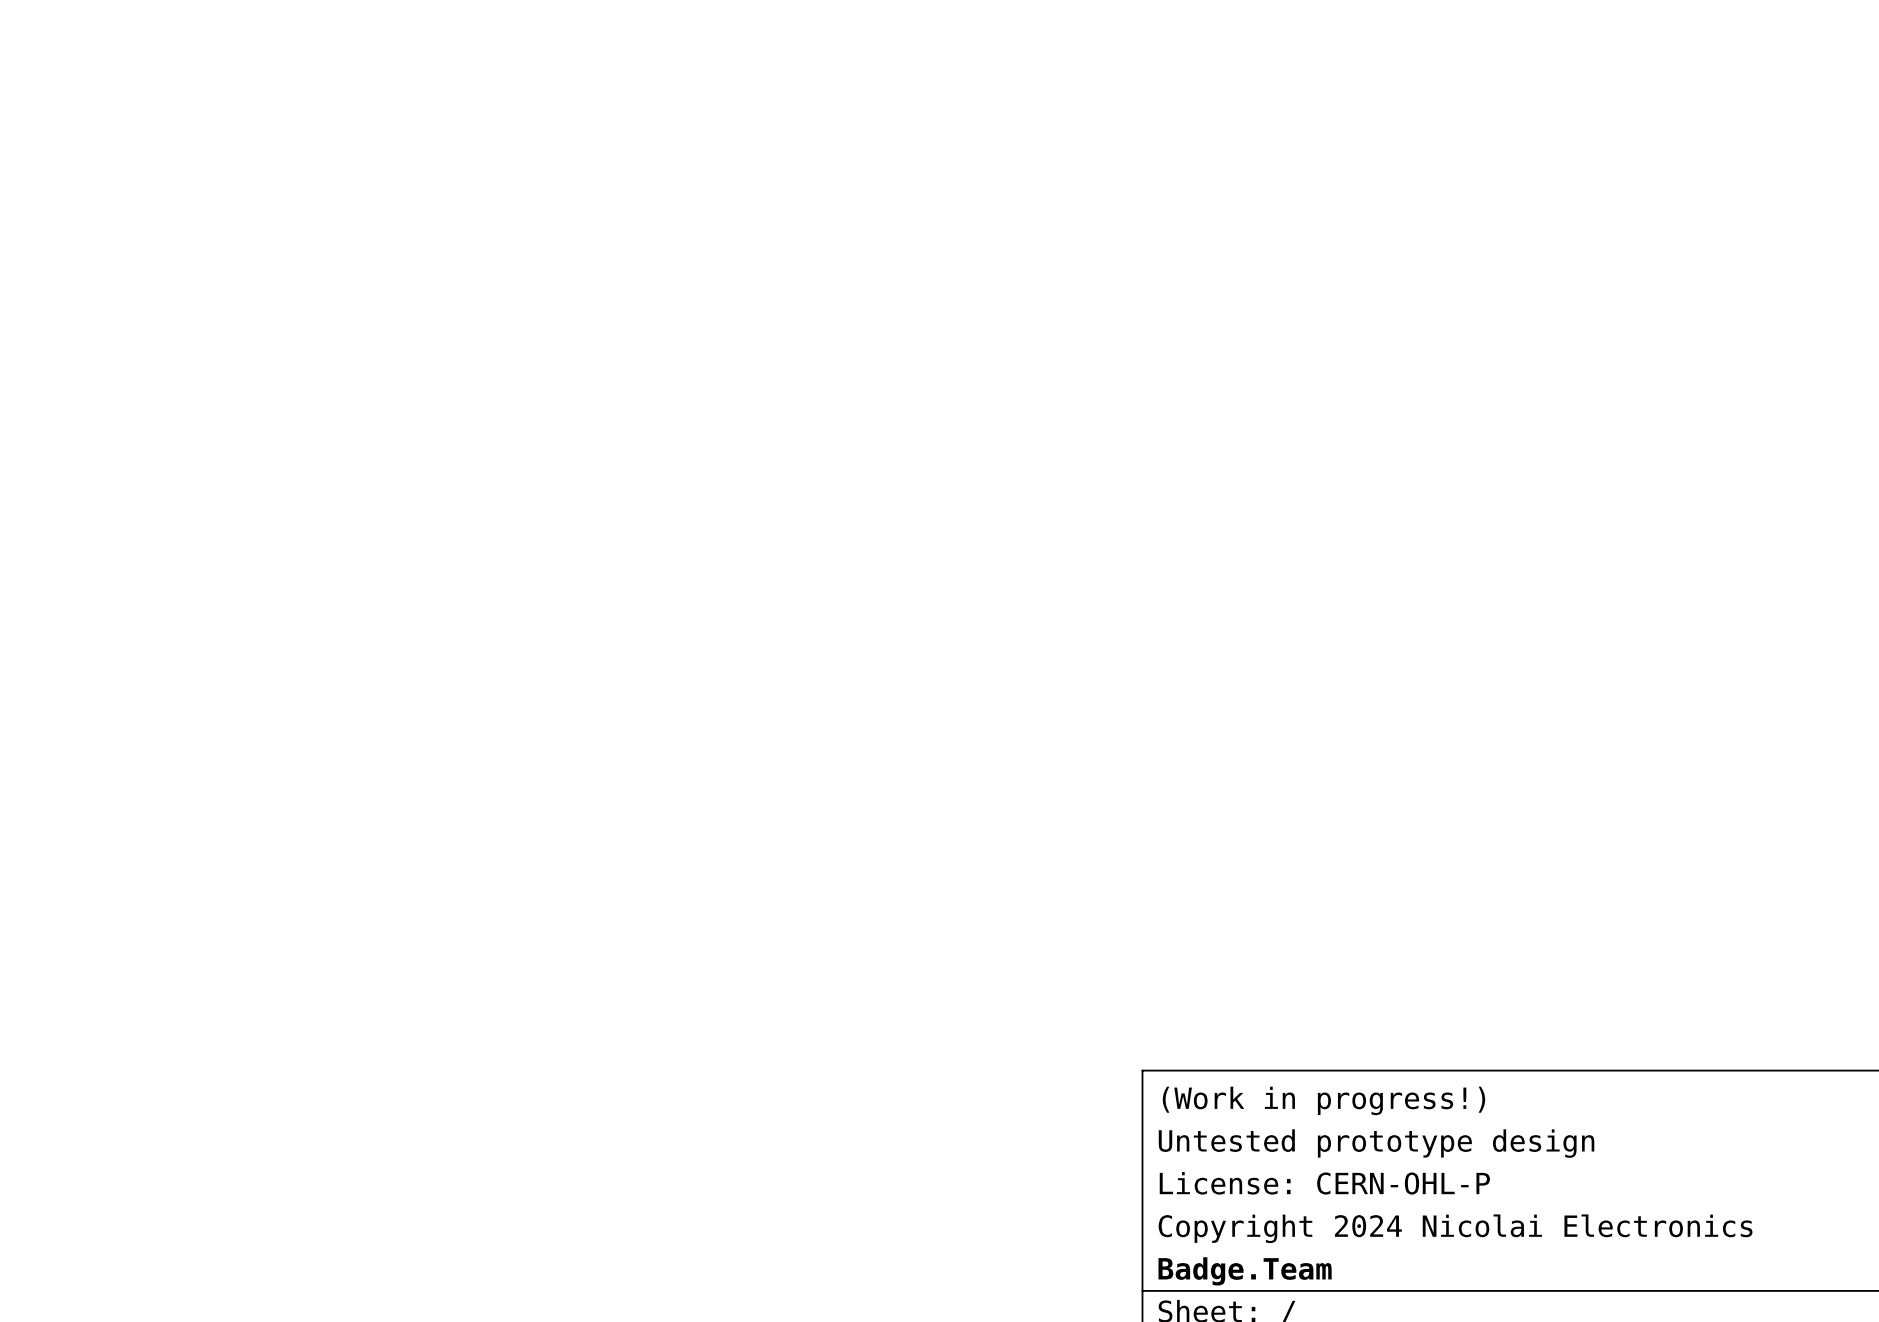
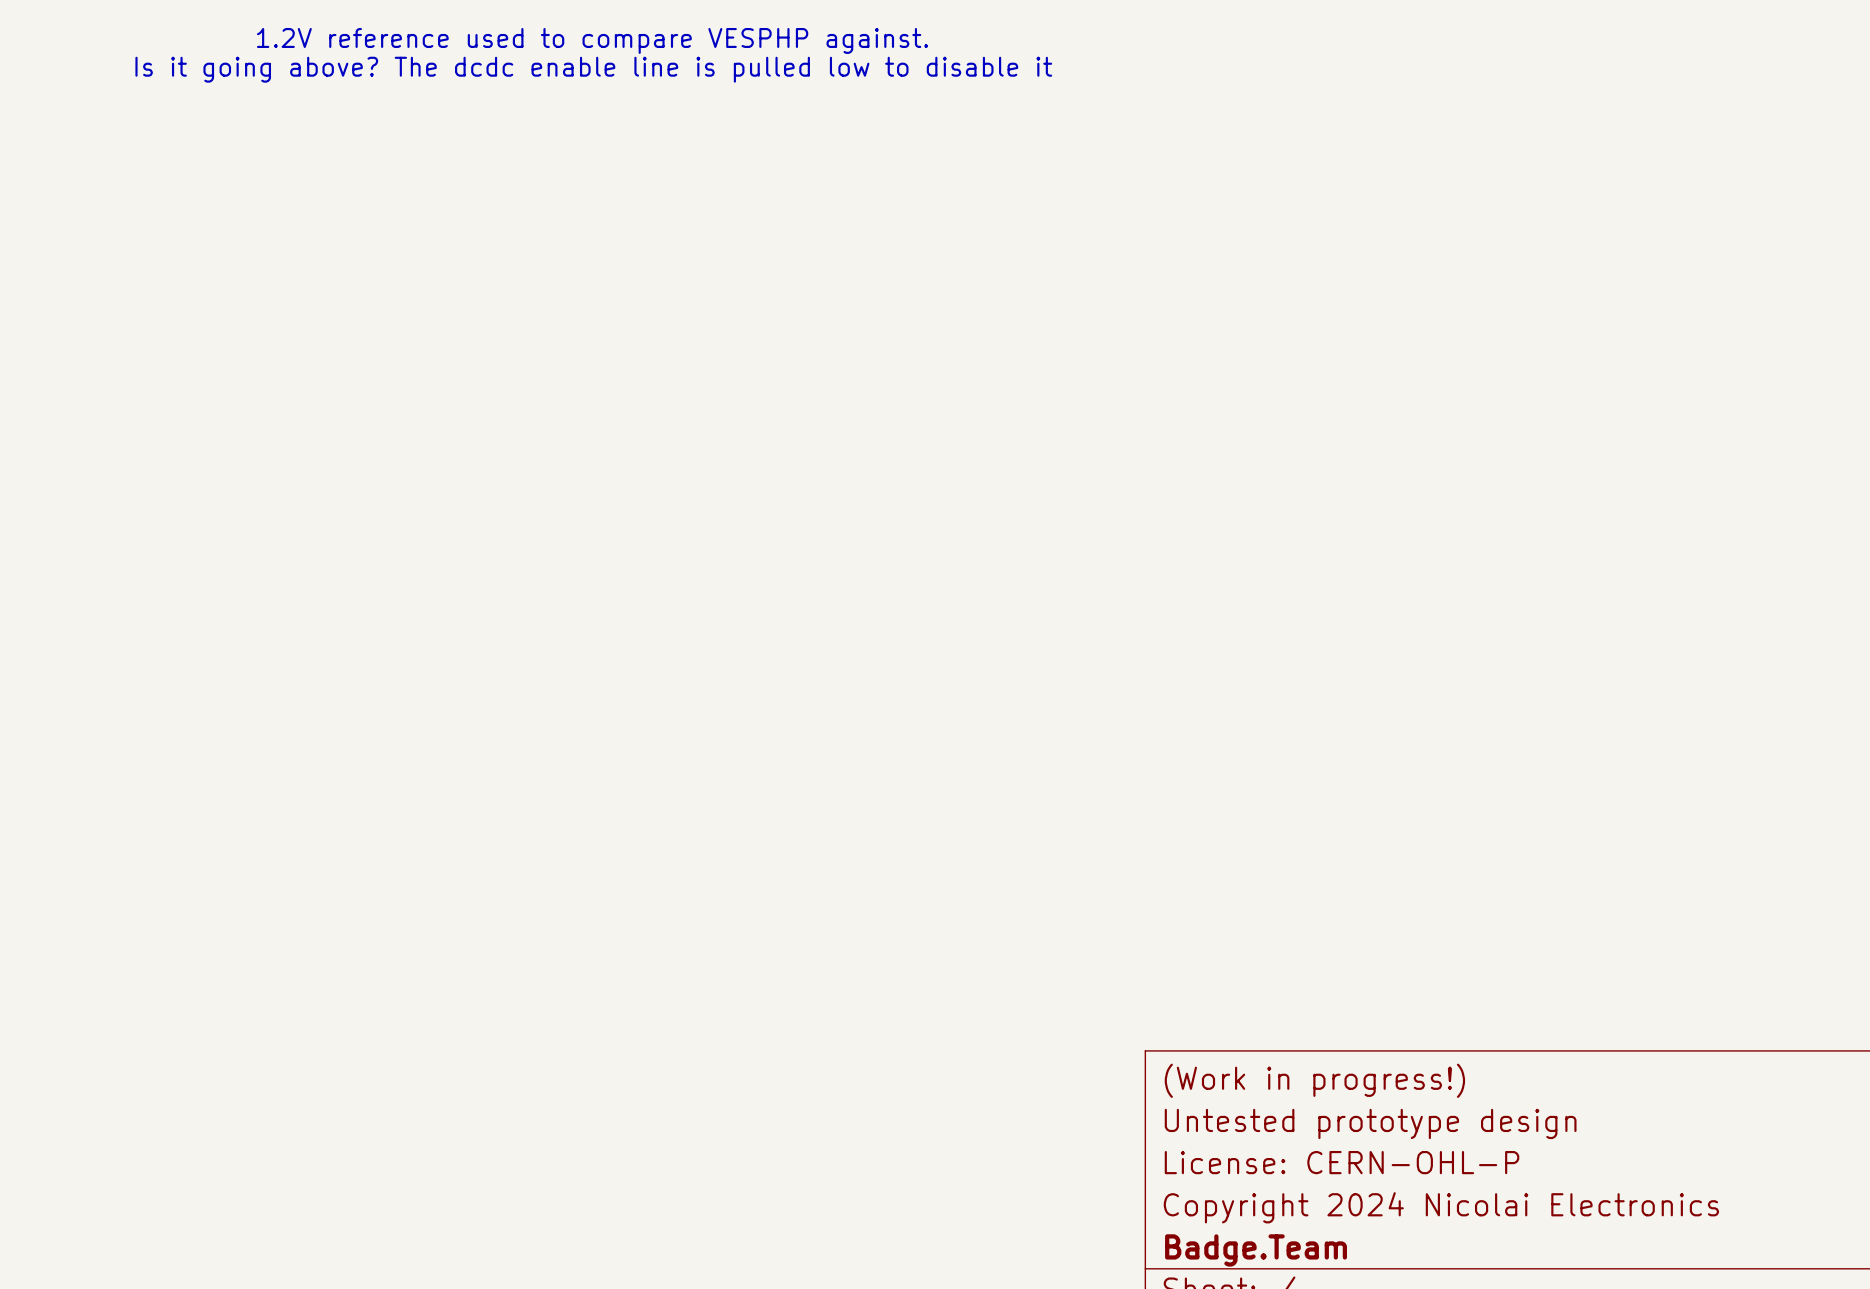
text: none -> 1.2V reference used to compare VESPHP against. (592, 40)
text: none -> Is it going above? The dcdc enable line is pulled low to disable it (593, 69)

